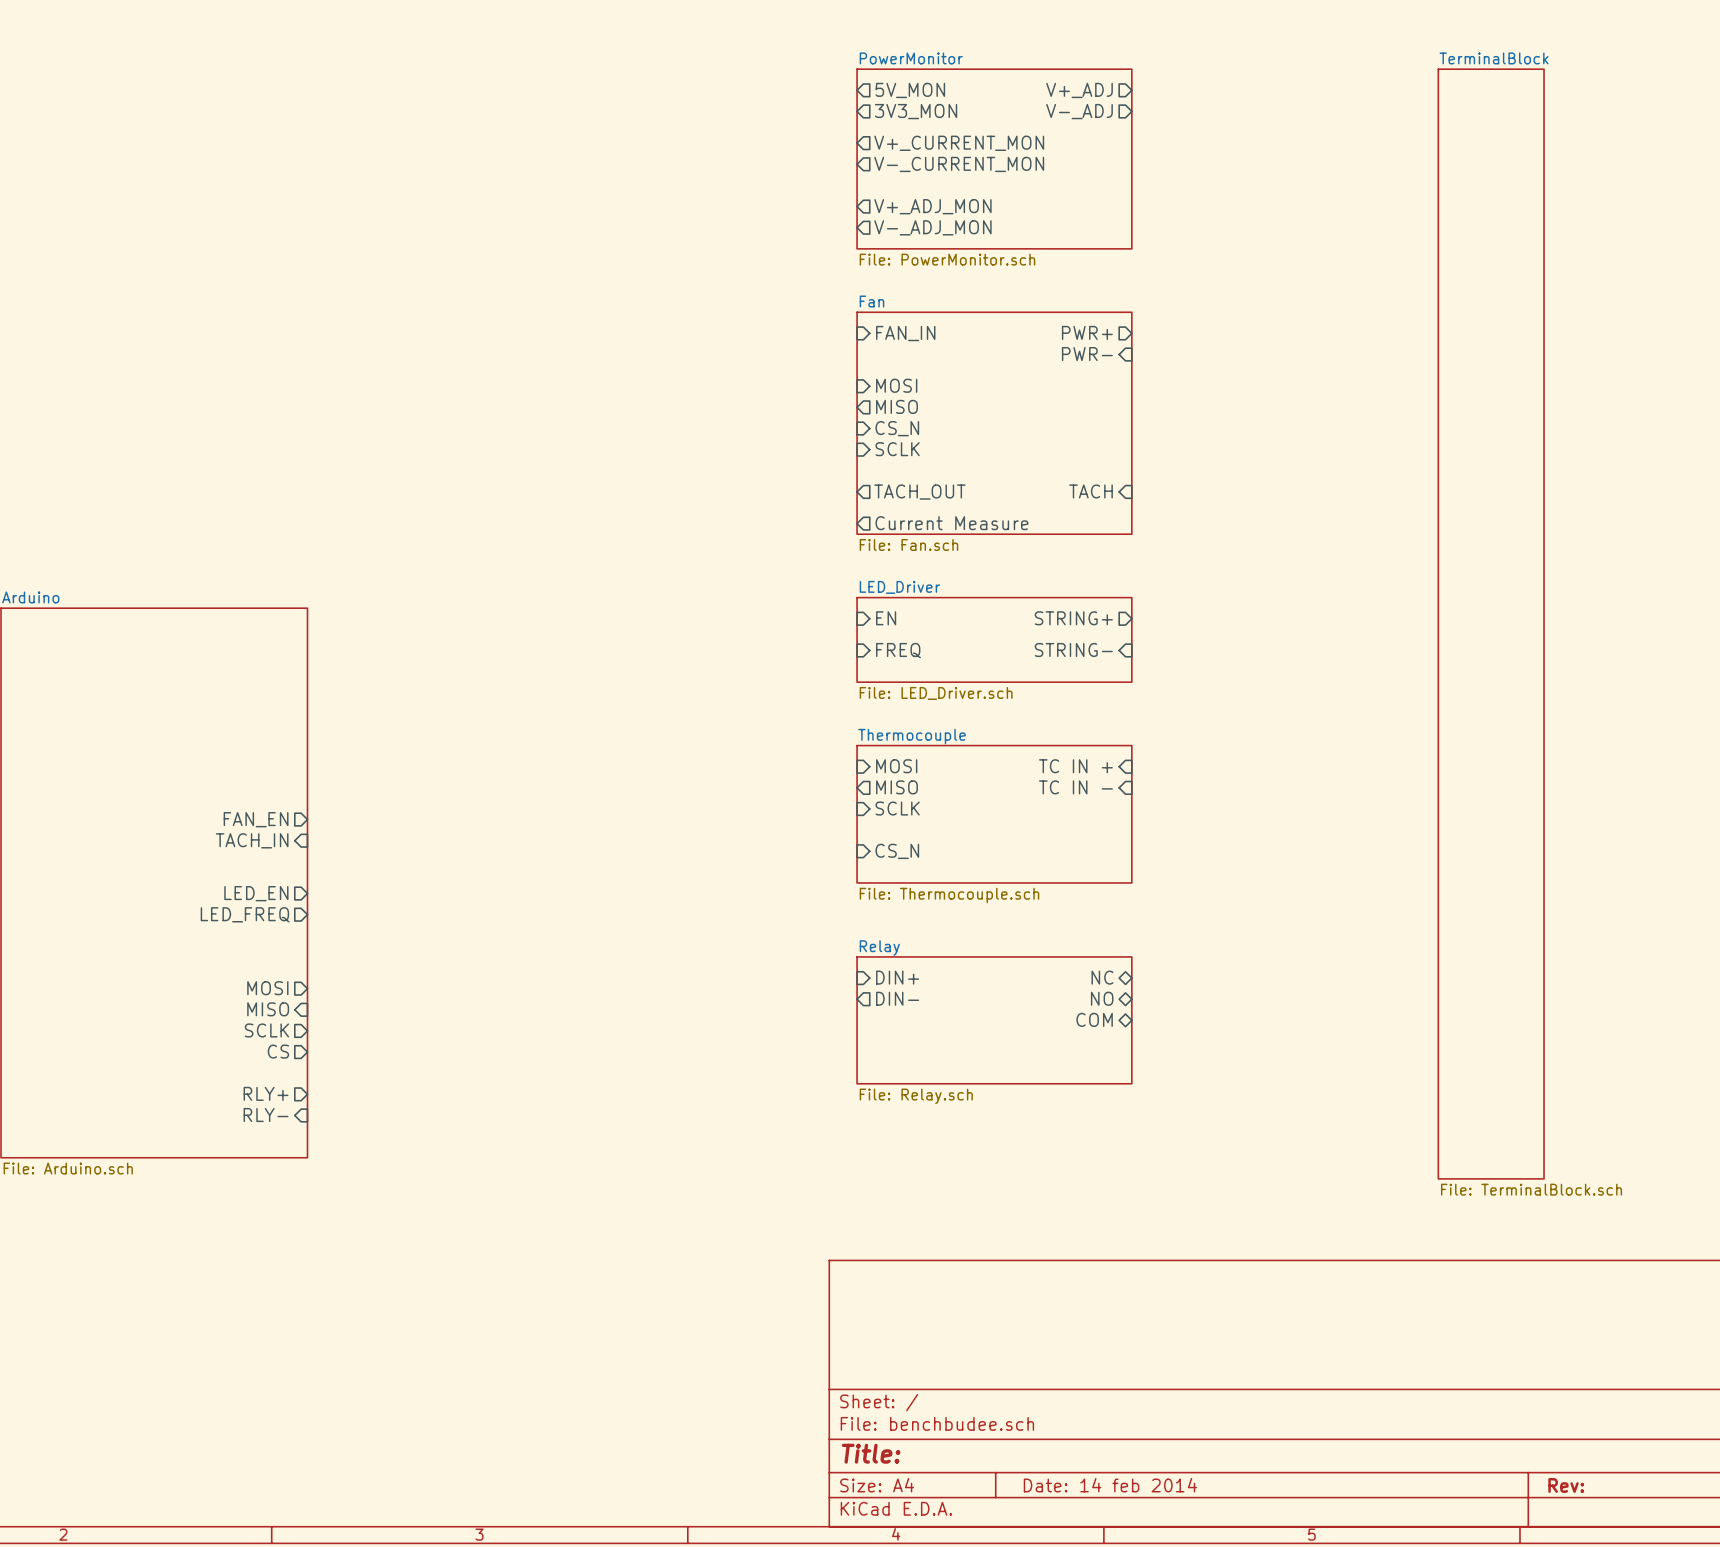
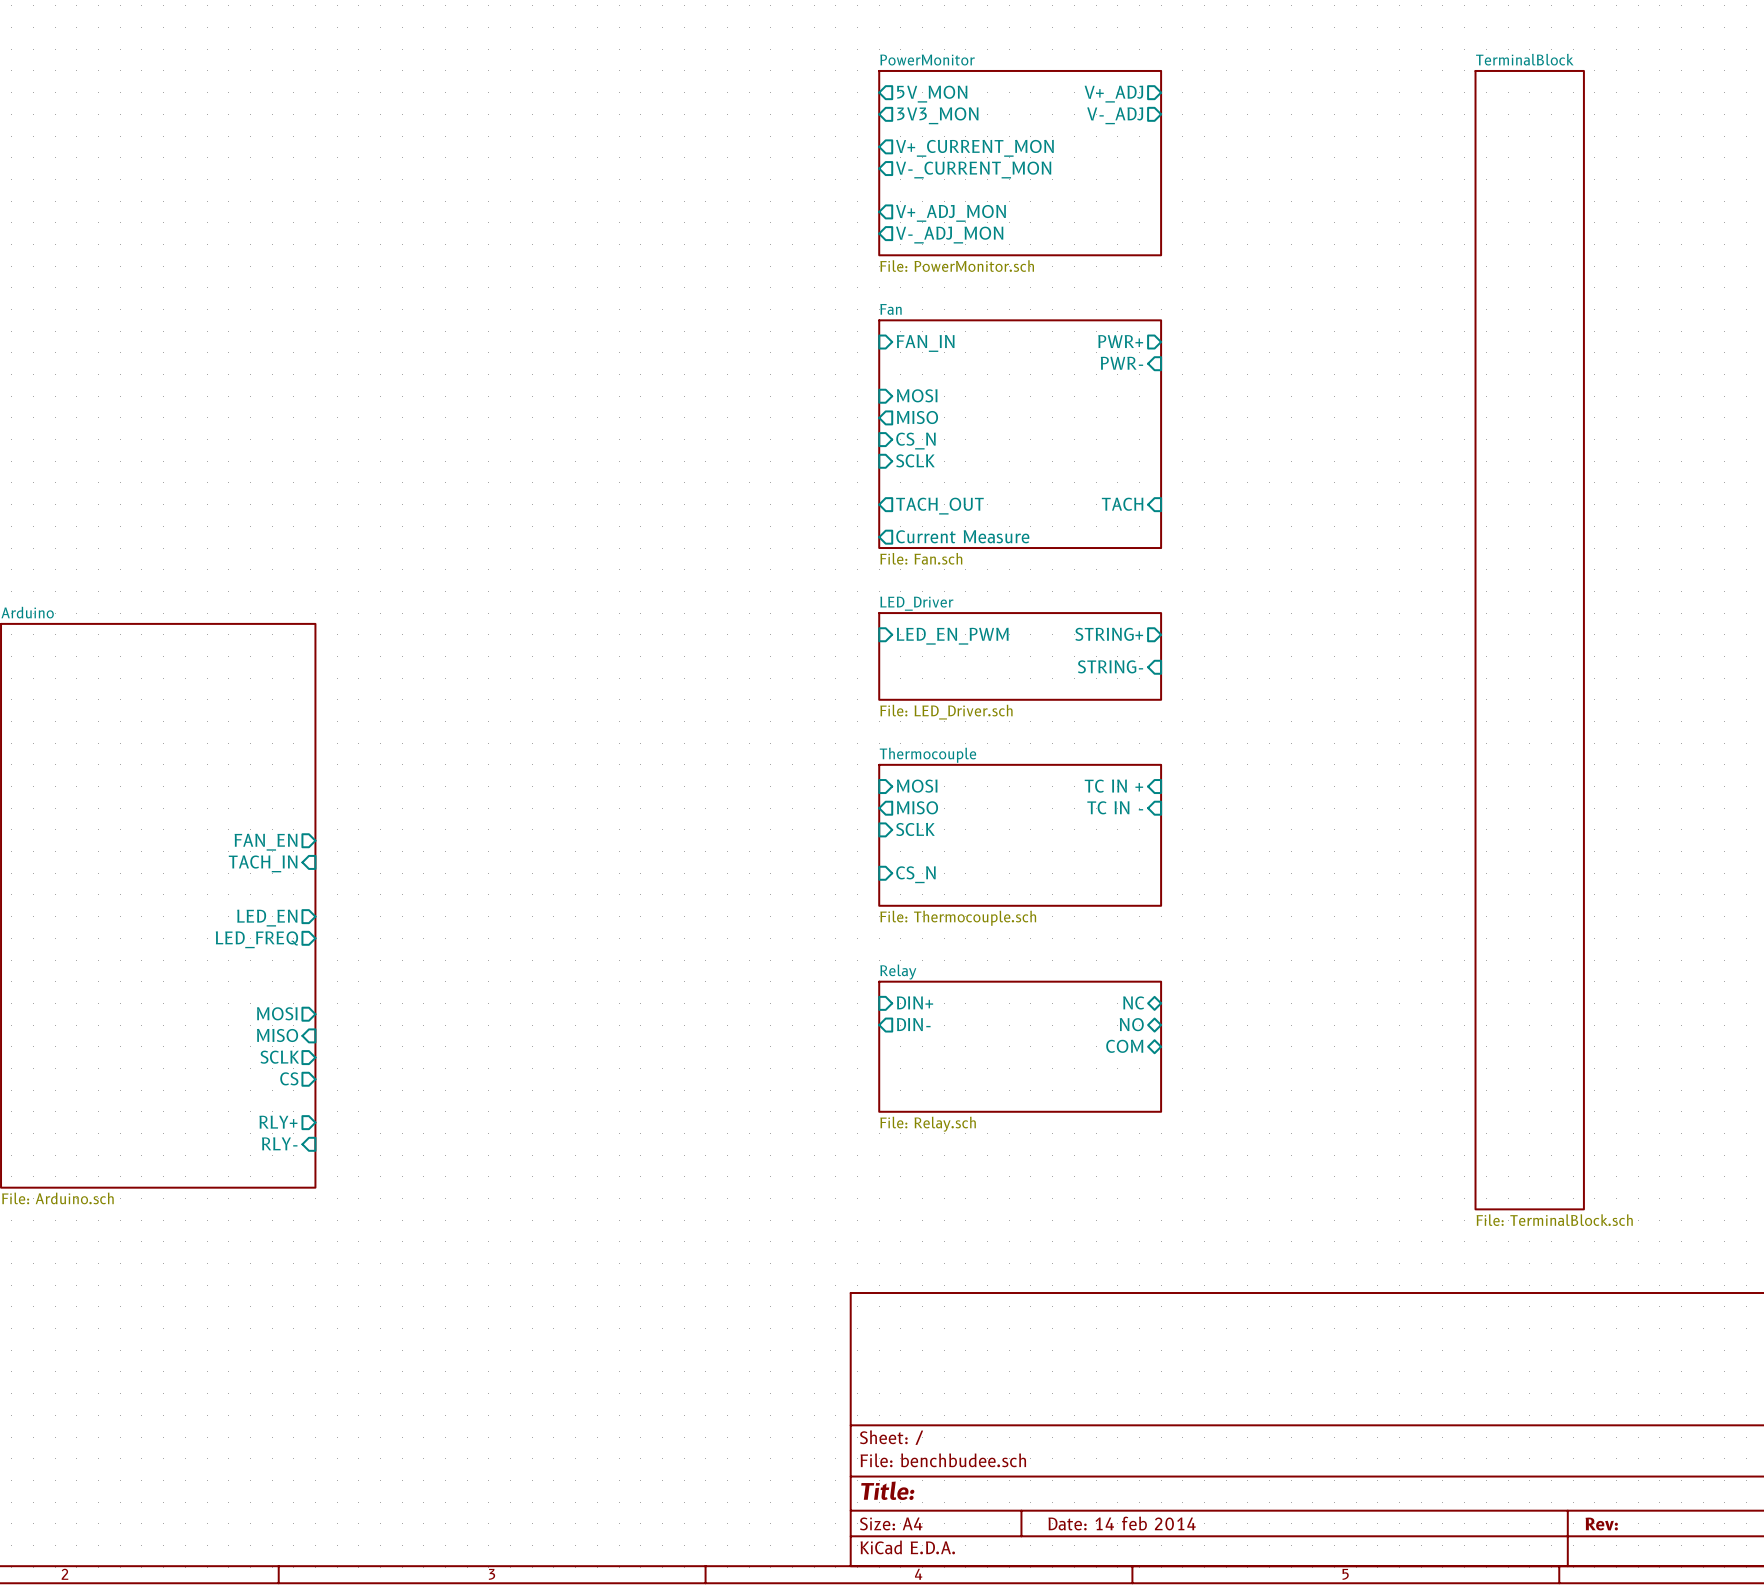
sheet pin: EN (886, 618) -> LED_EN_PWM (952, 636)
sheet pin: FREQ (898, 650) -> none

